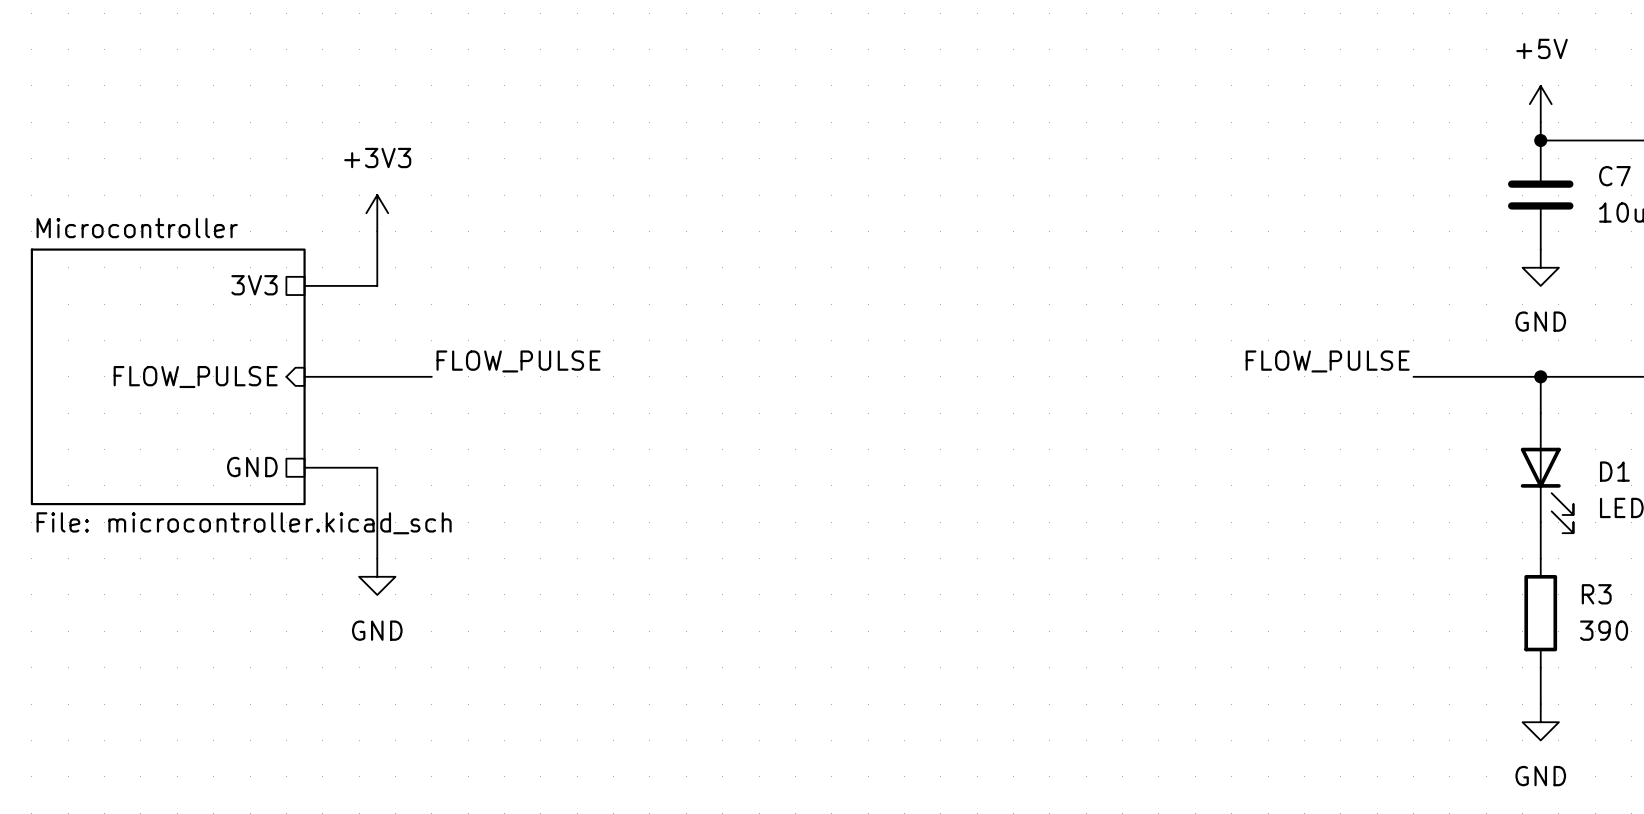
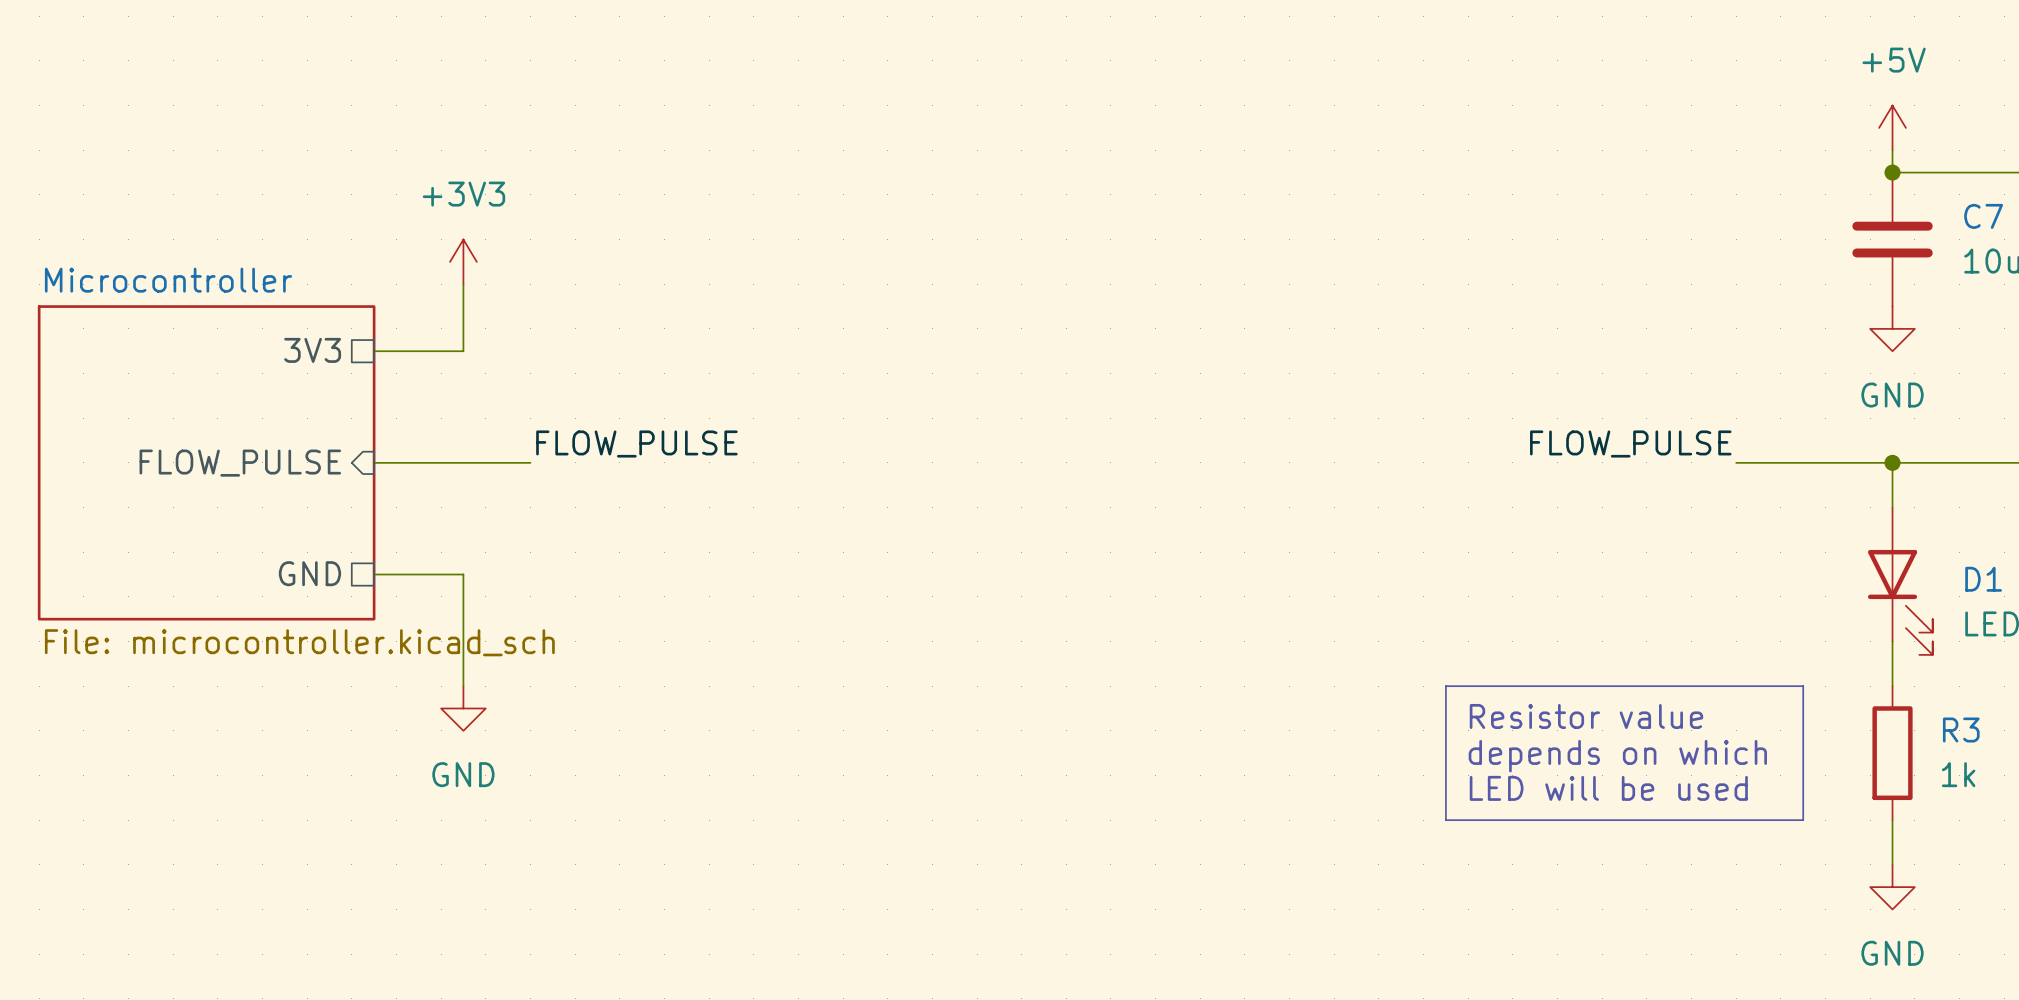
line: none -> (1445, 686) (1803, 686) (1803, 820) (1445, 820) (1445, 686)
text: none -> Resistor value (1586, 716)
text: none -> depends on which (1617, 756)
R3 value: 390 (1604, 630) -> 1k (1958, 774)
text: none -> LED will be used (1608, 788)

